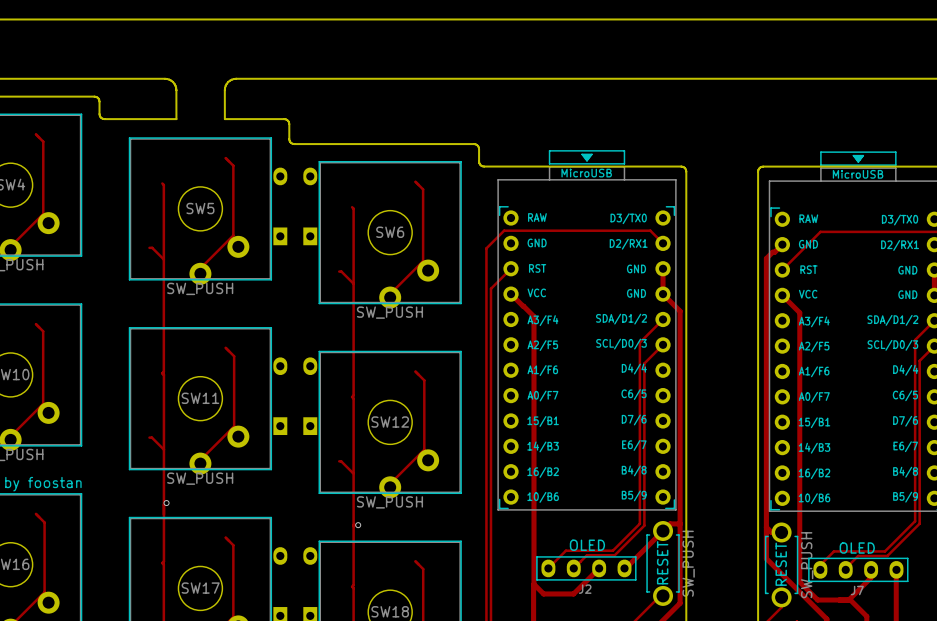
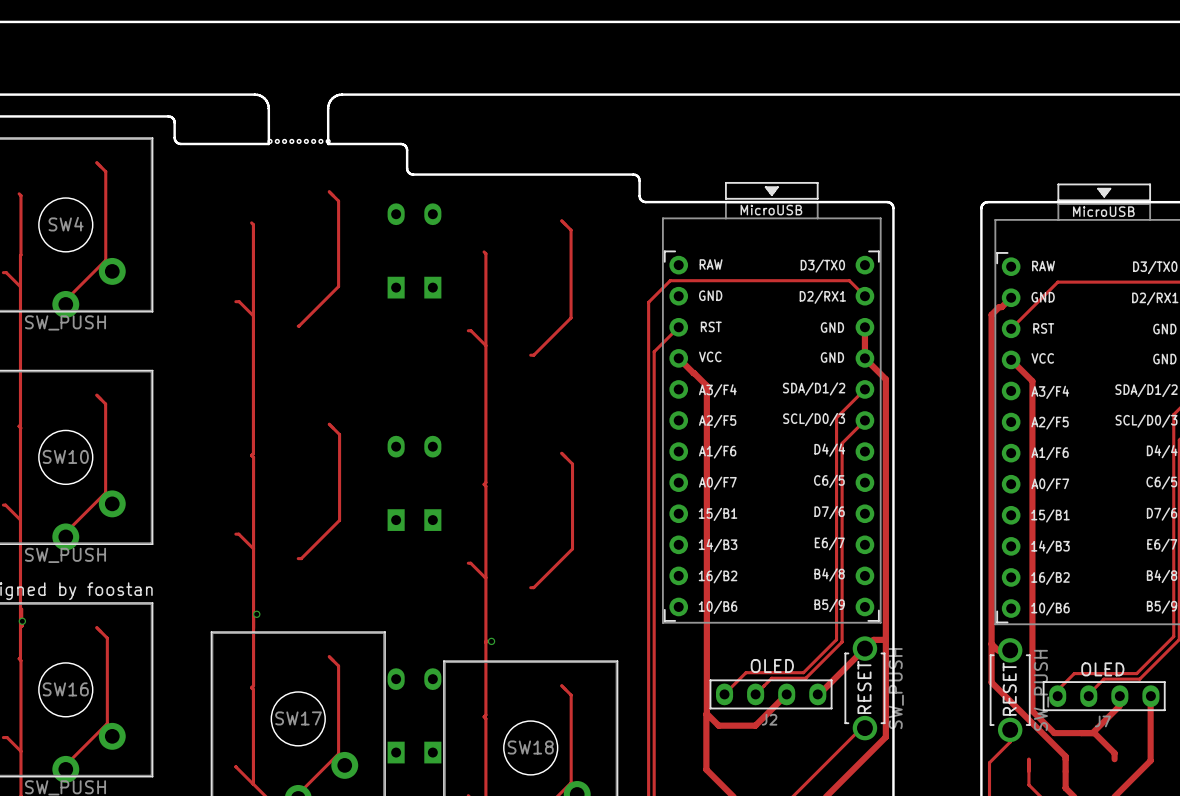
part: none -> (299, 141)
SW5: SW_PUSH (200, 211) -> none
SW6: SW_PUSH (390, 234) -> none
SW11: SW_PUSH (200, 400) -> none
SW12: SW_PUSH (390, 424) -> none

